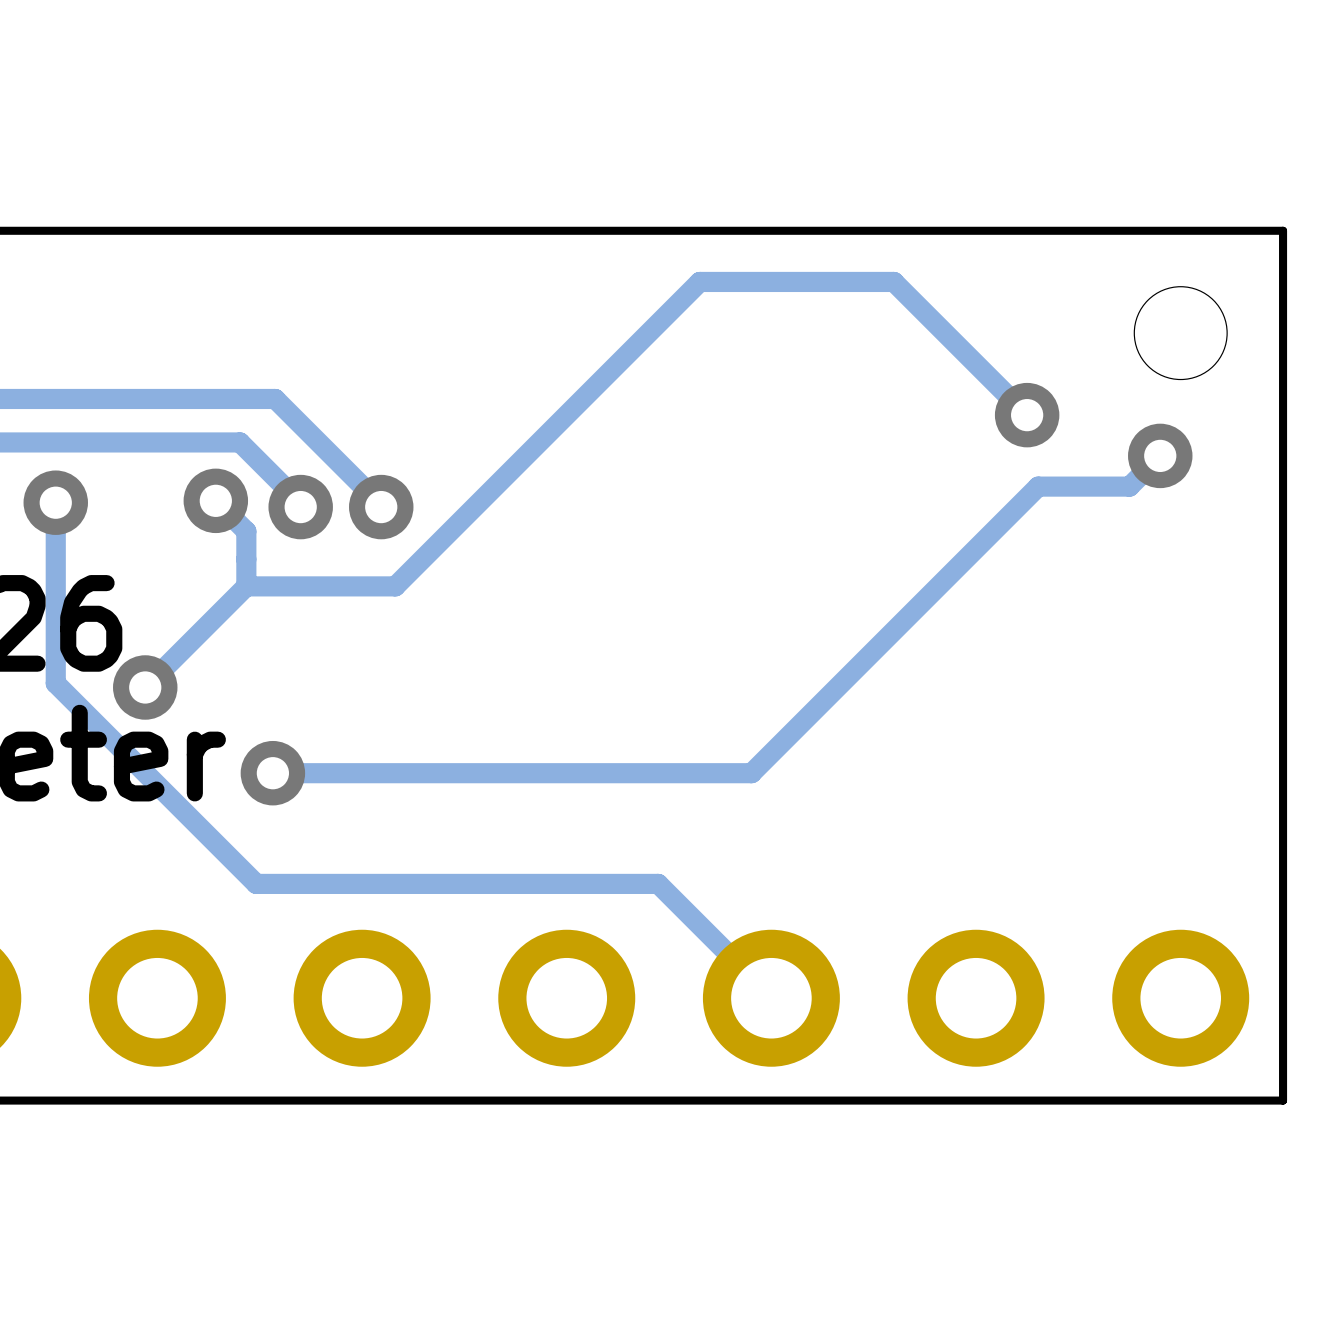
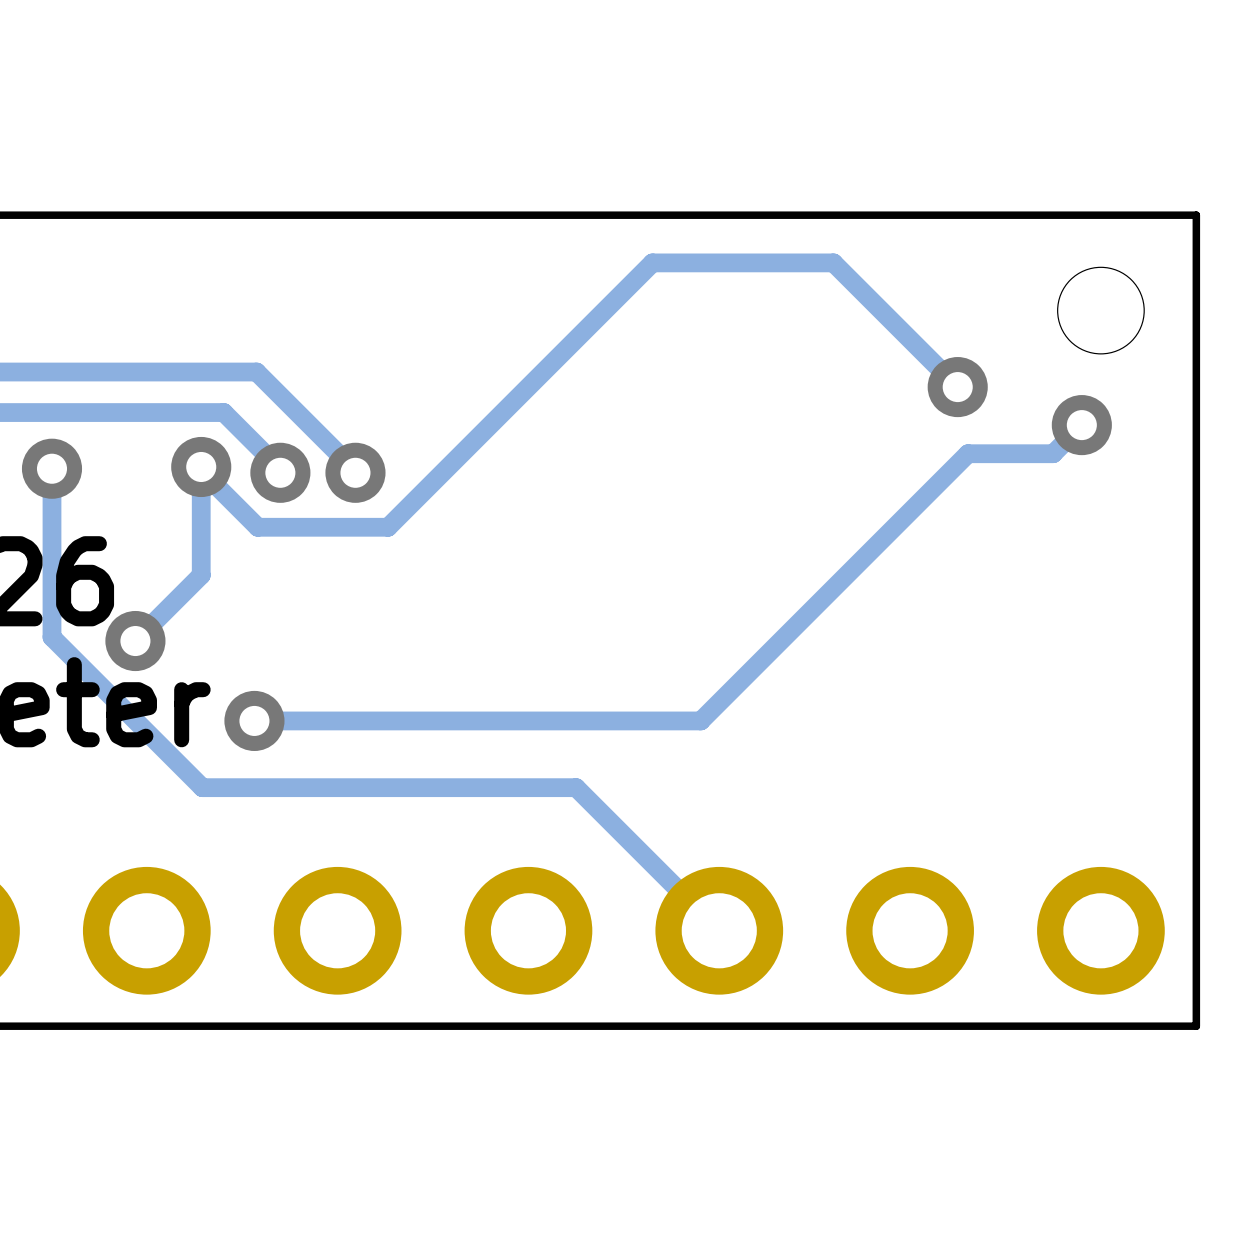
track: (215, 500) (246, 531) (246, 586) -> (201, 466) (201, 575)
track: (416, 565) (395, 586) (246, 586) -> (388, 527) (257, 527) (201, 470)
track: (246, 586) (215, 616) -> none
track: (217, 844) (256, 883) (658, 883) (772, 998) -> (202, 787) (576, 787) (719, 930)

